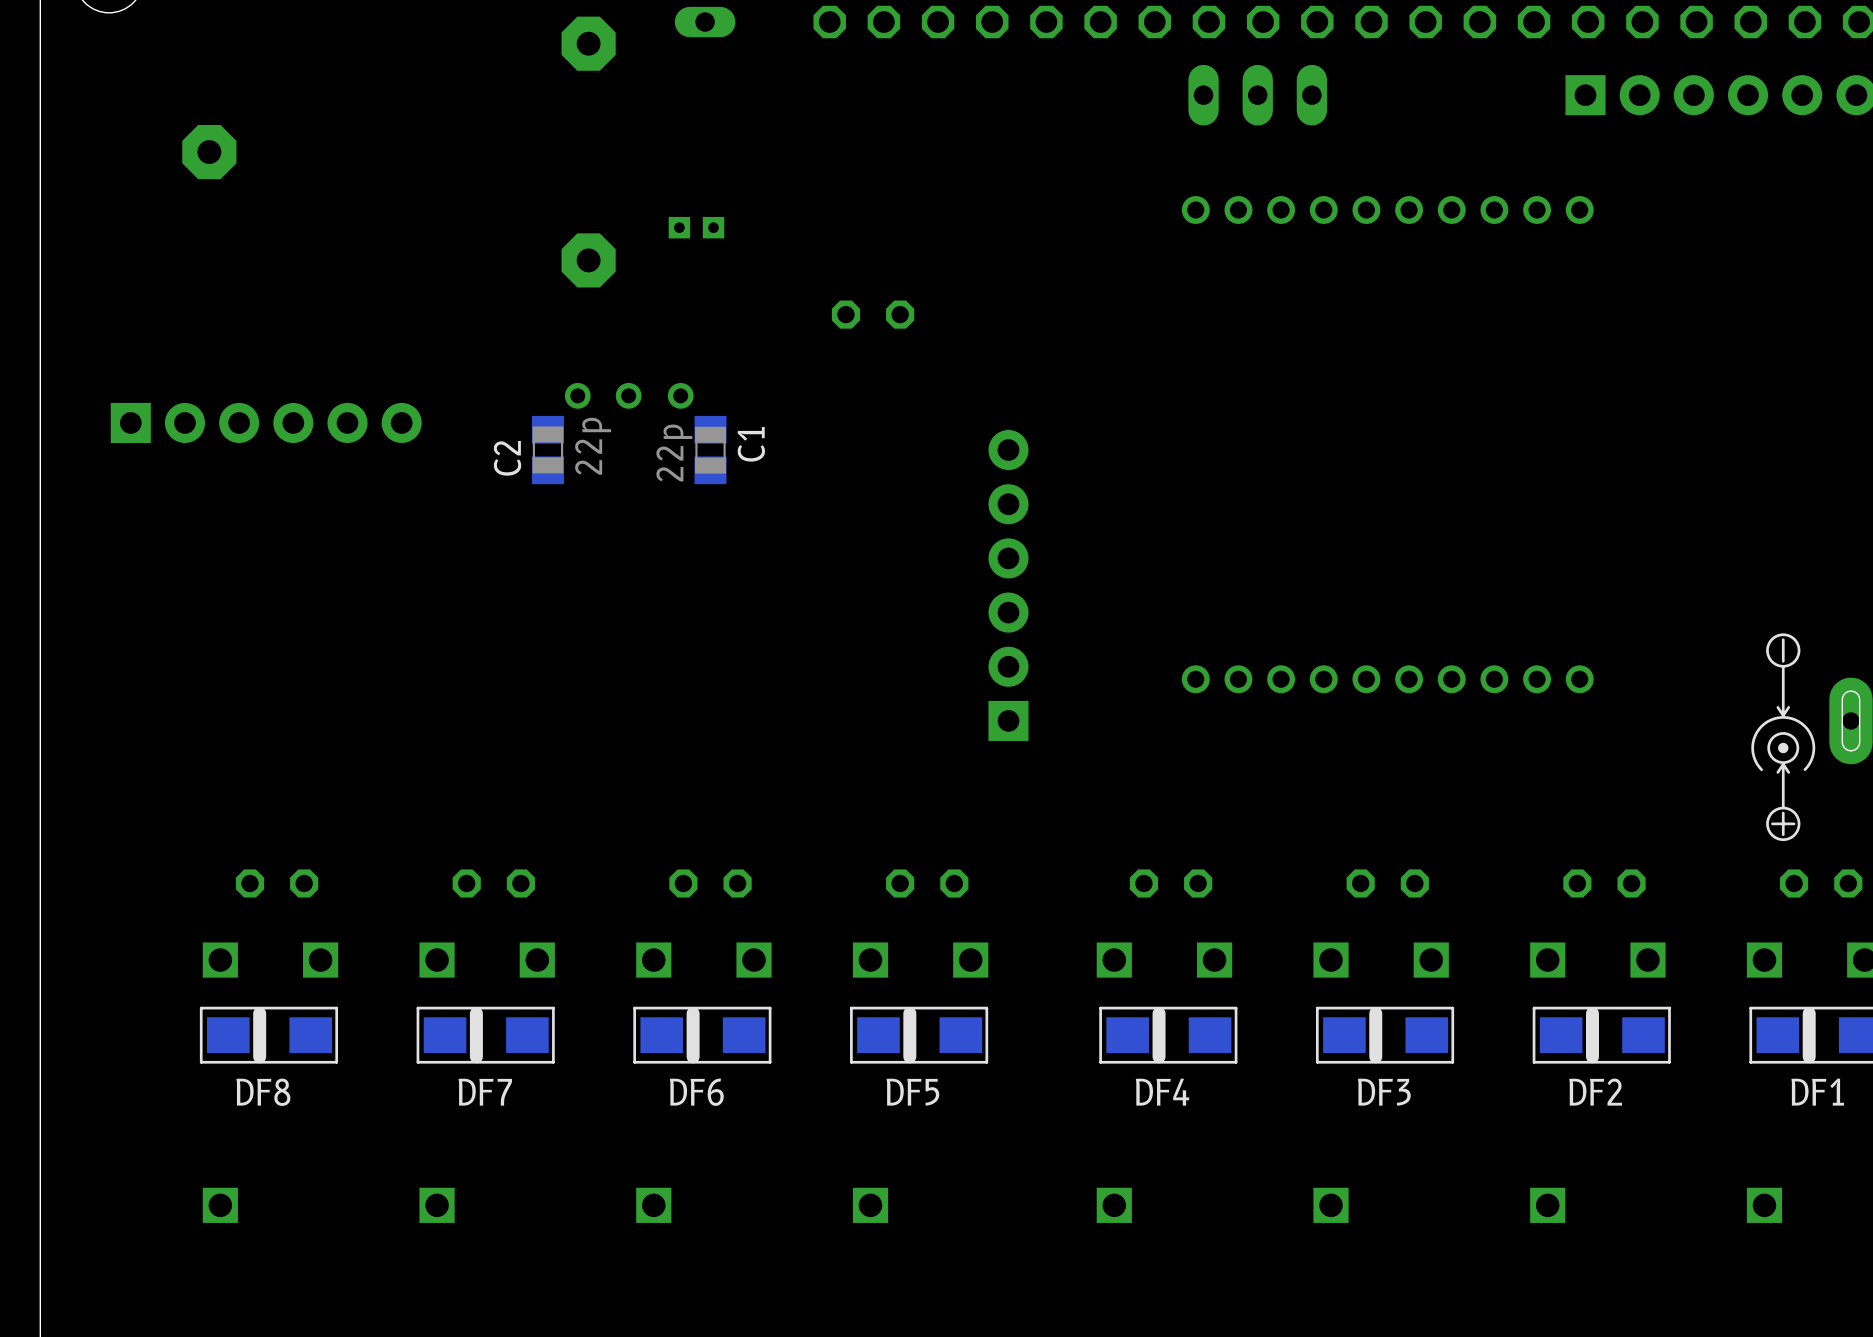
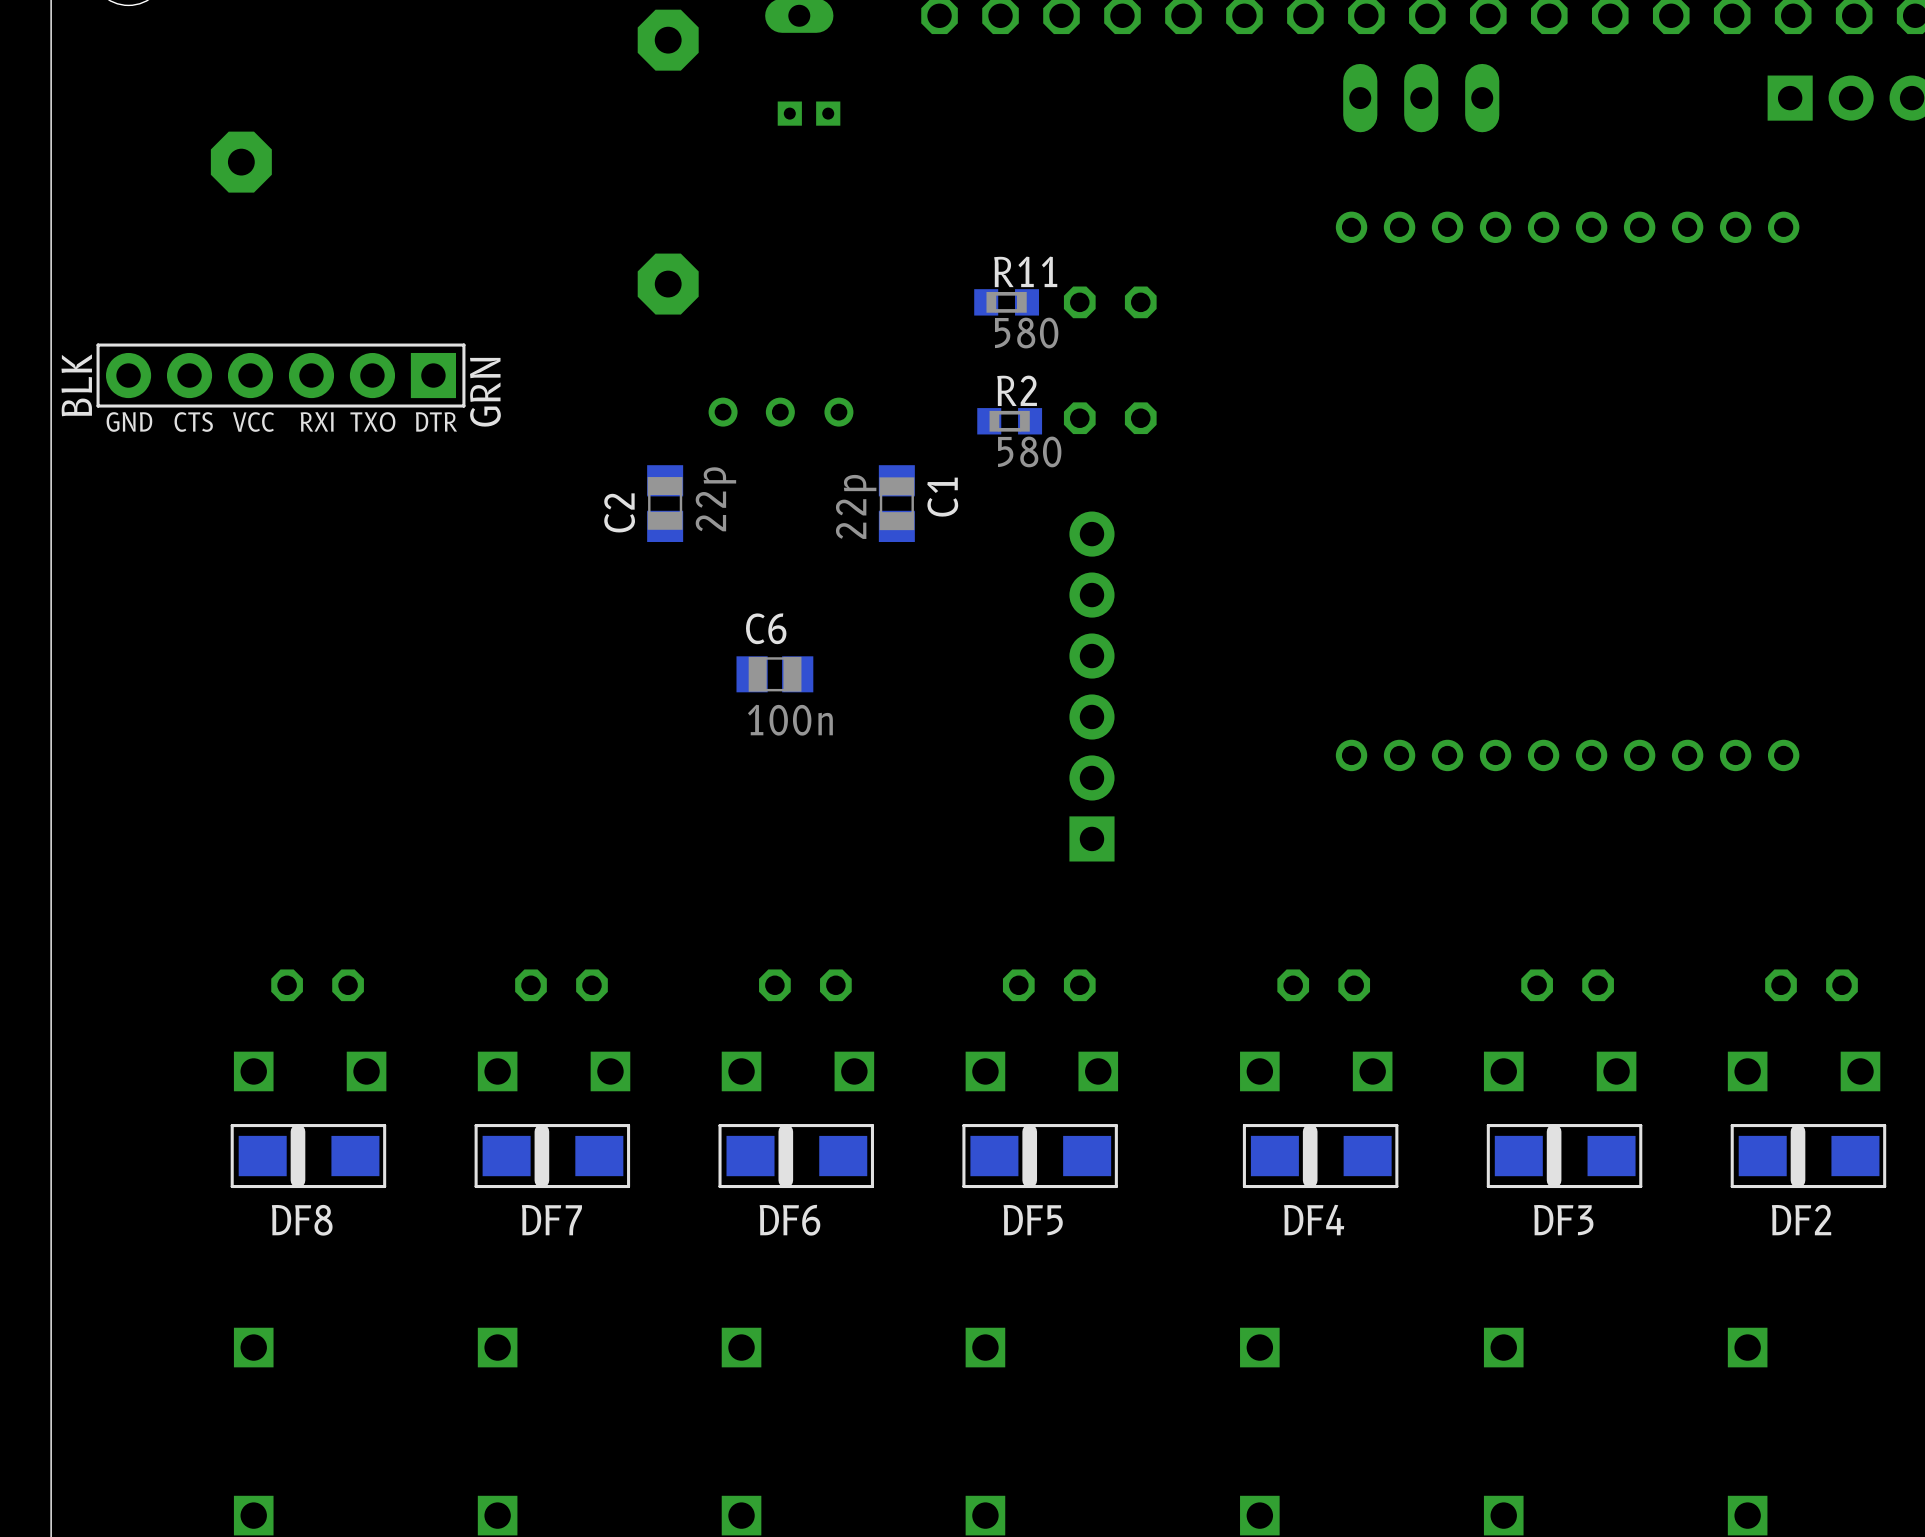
part position: (696, 227) -> (809, 113)
R11: none -> 580 (1006, 302)
part: none -> (1110, 302)
part: (873, 314) -> none
part: none -> (1110, 418)
R2: none -> 580 (1009, 421)
part position: (629, 395) -> (781, 412)
part side: top (266, 422) -> bottom (280, 375)
C2 position: (547, 450) -> (665, 503)
C1 position: (710, 450) -> (896, 503)
part position: (1008, 585) -> (1091, 686)
C6: none -> 100n (774, 674)

